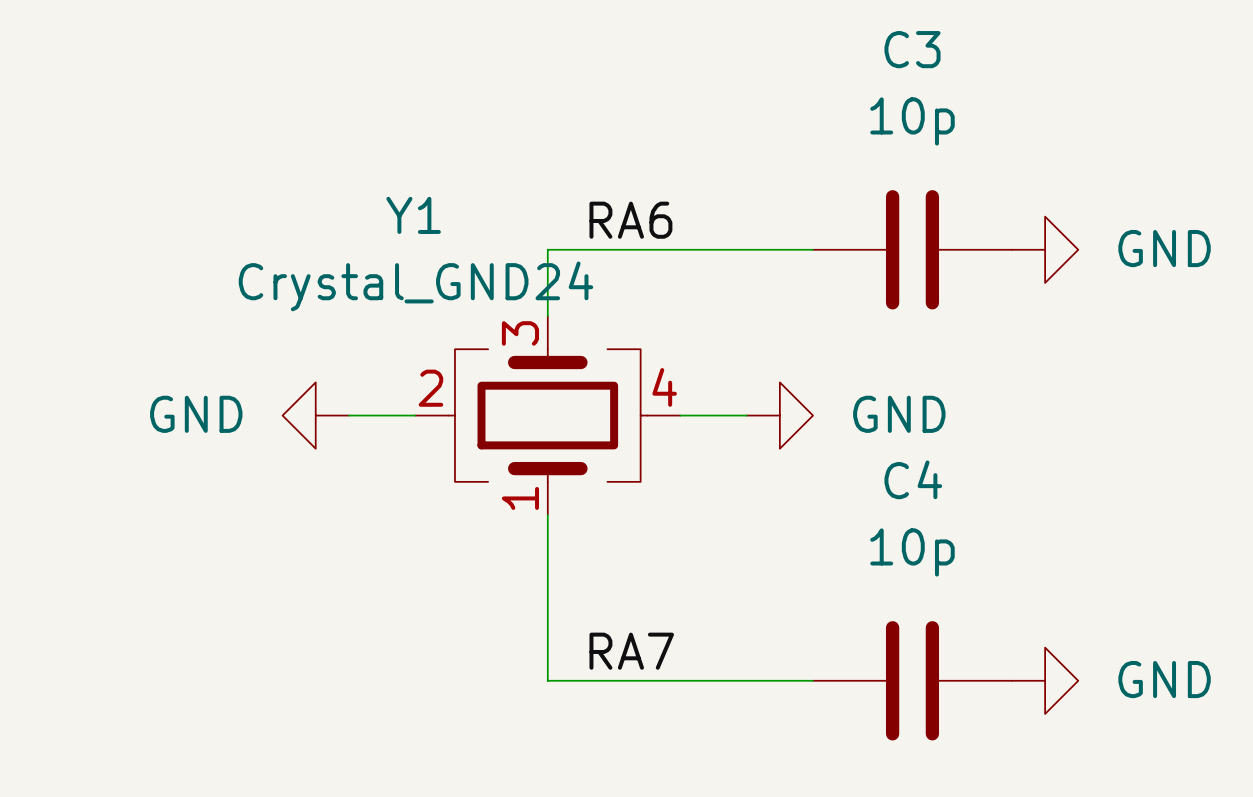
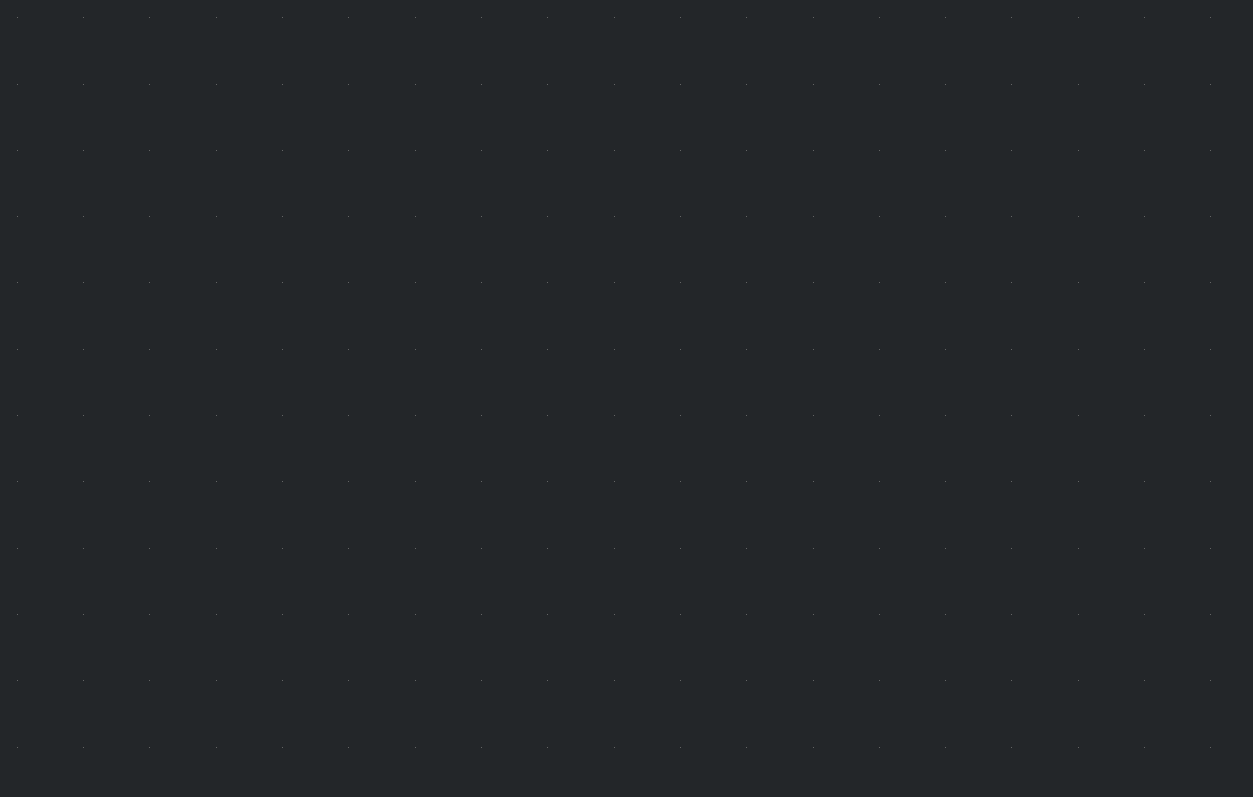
label: RA6 (630, 220) -> none
wire: (813, 249) (547, 249) (547, 316) -> none
C3: 10p (912, 249) -> none
power symbol: GND (1045, 249) -> none
power symbol: GND (315, 415) -> none
wire: (348, 415) (415, 415) -> none
Y1: Crystal_GND24 (547, 415) -> none
wire: (680, 415) (746, 415) -> none
power symbol: GND (779, 415) -> none
wire: (547, 515) (547, 680) (813, 680) -> none
label: RA7 (631, 651) -> none
C4: 10p (912, 680) -> none
power symbol: GND (1045, 680) -> none

